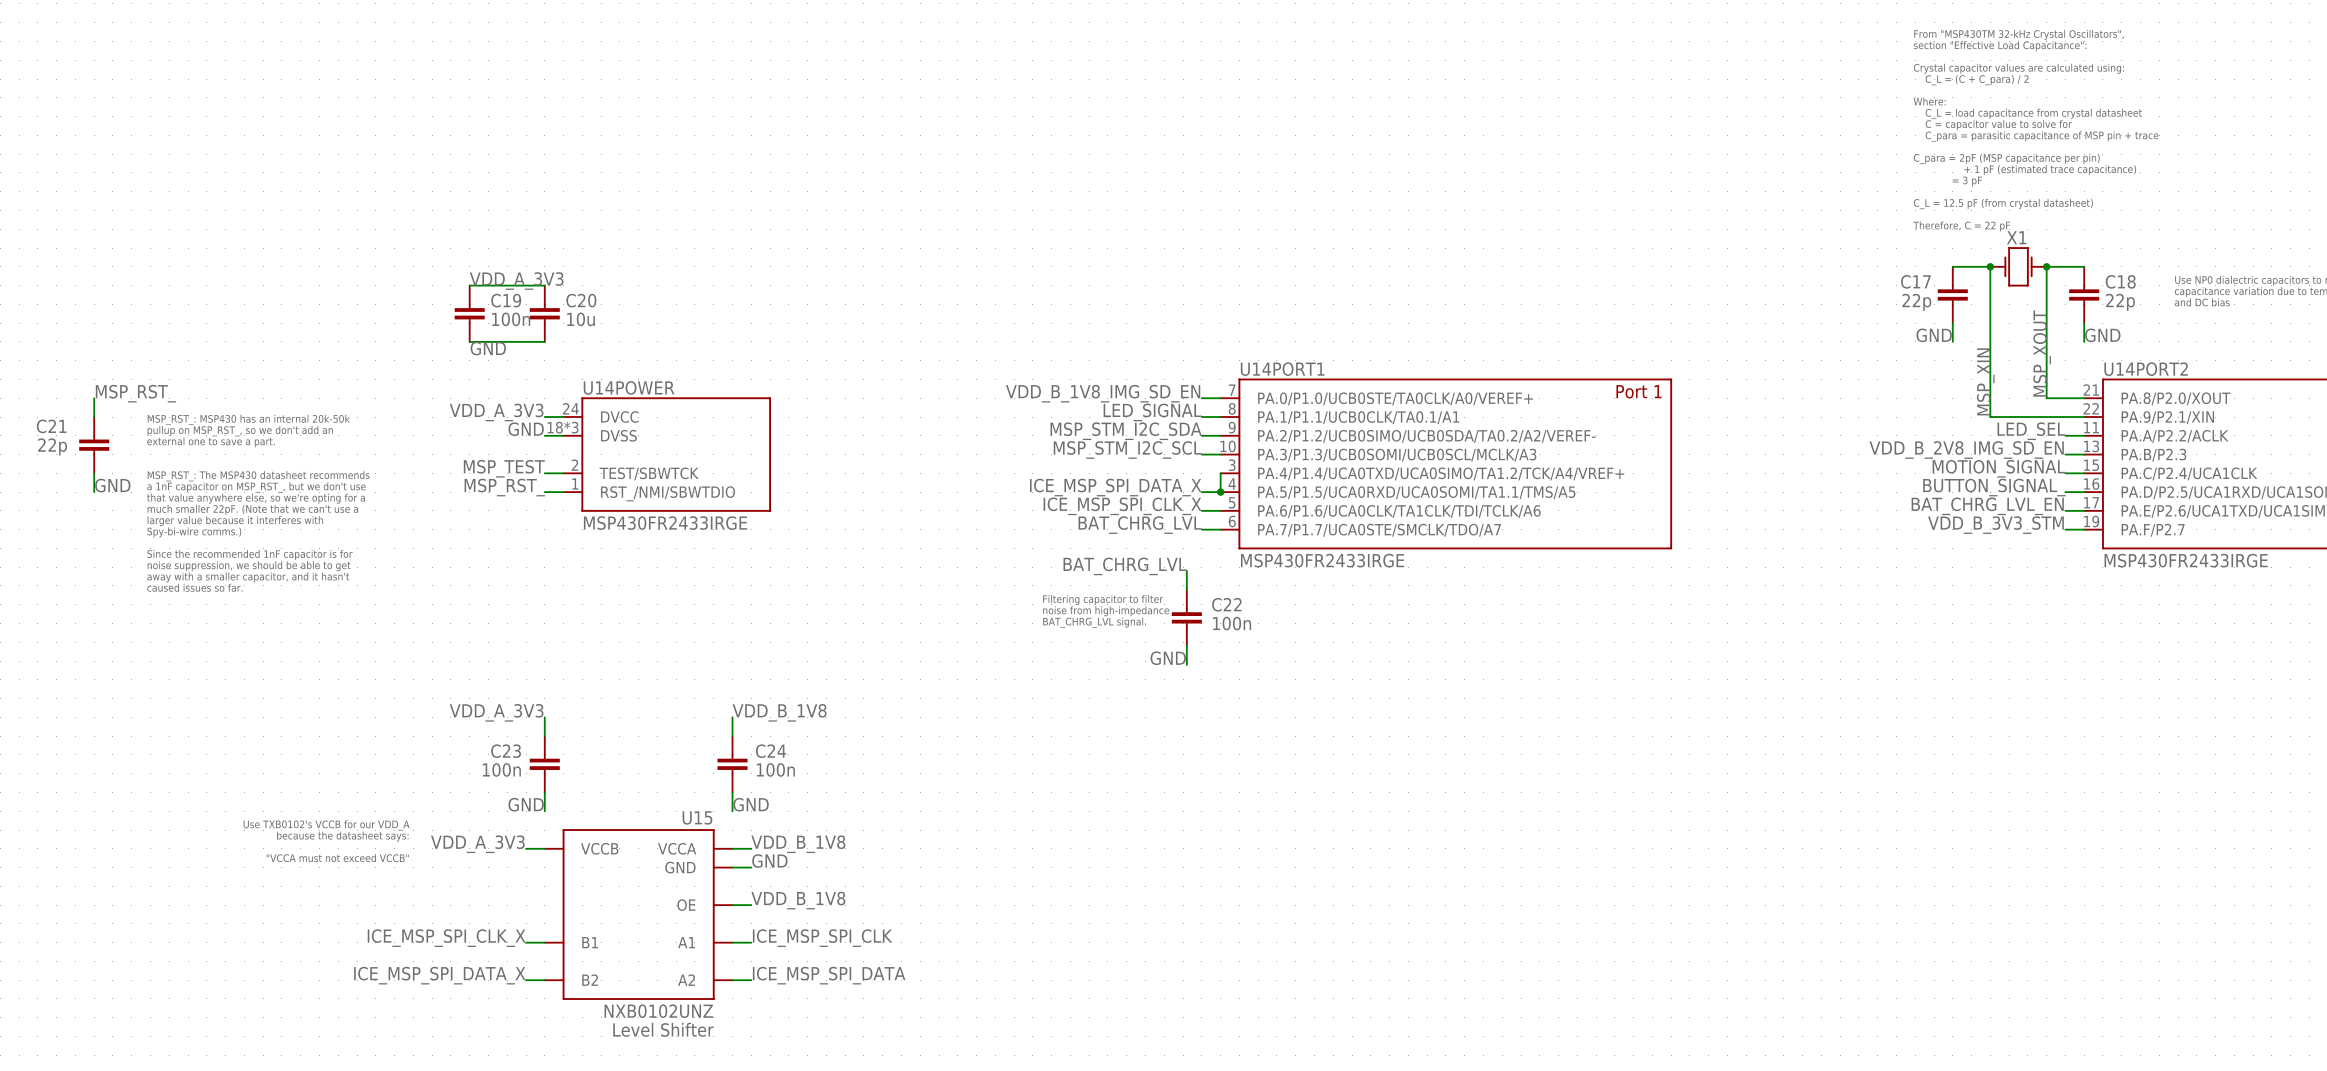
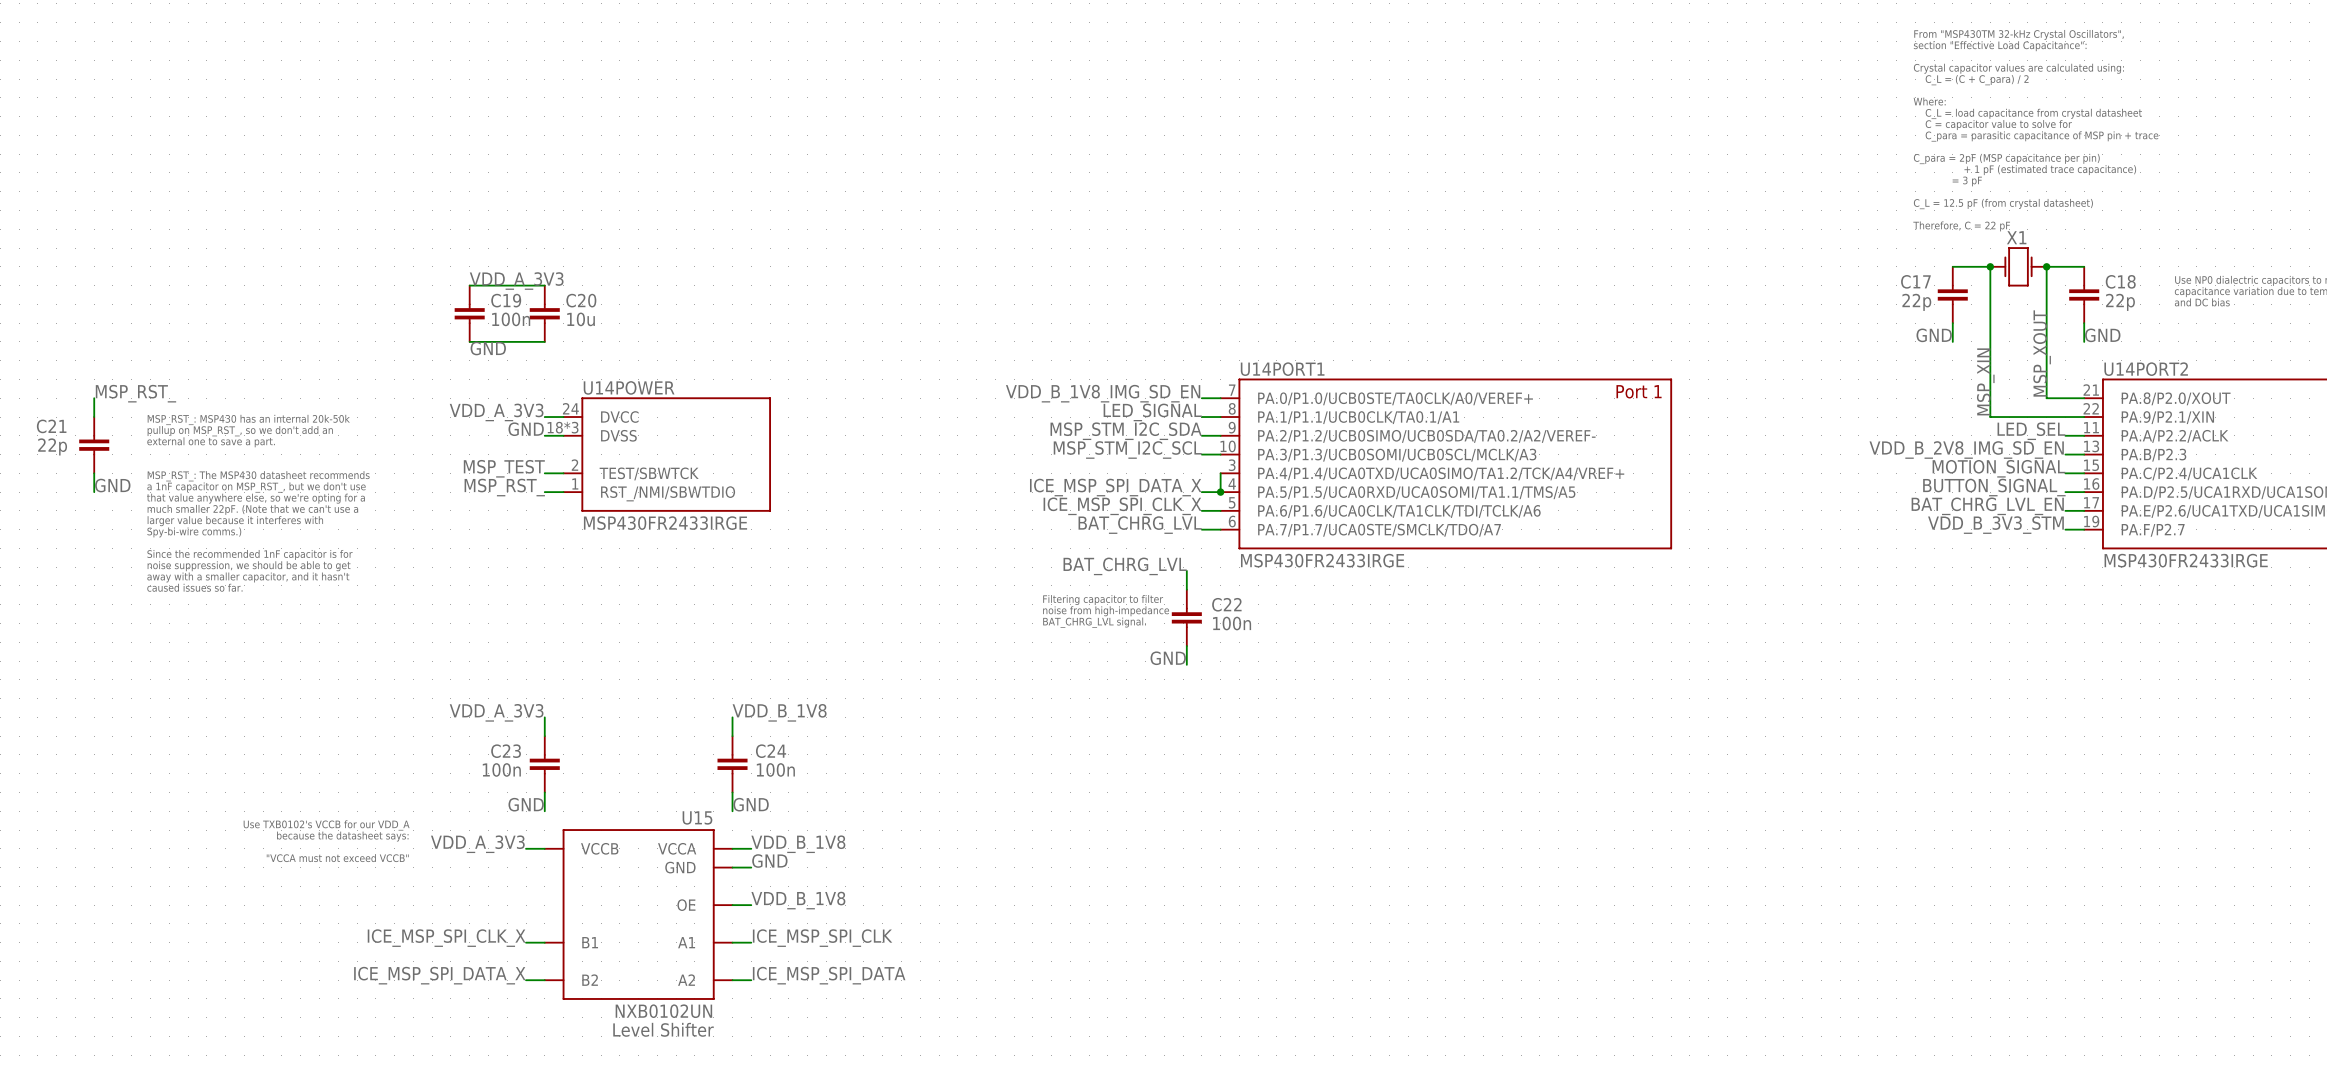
U15 text: NXB0102UNZ (658, 1011) -> NXB0102UN (663, 1011)

